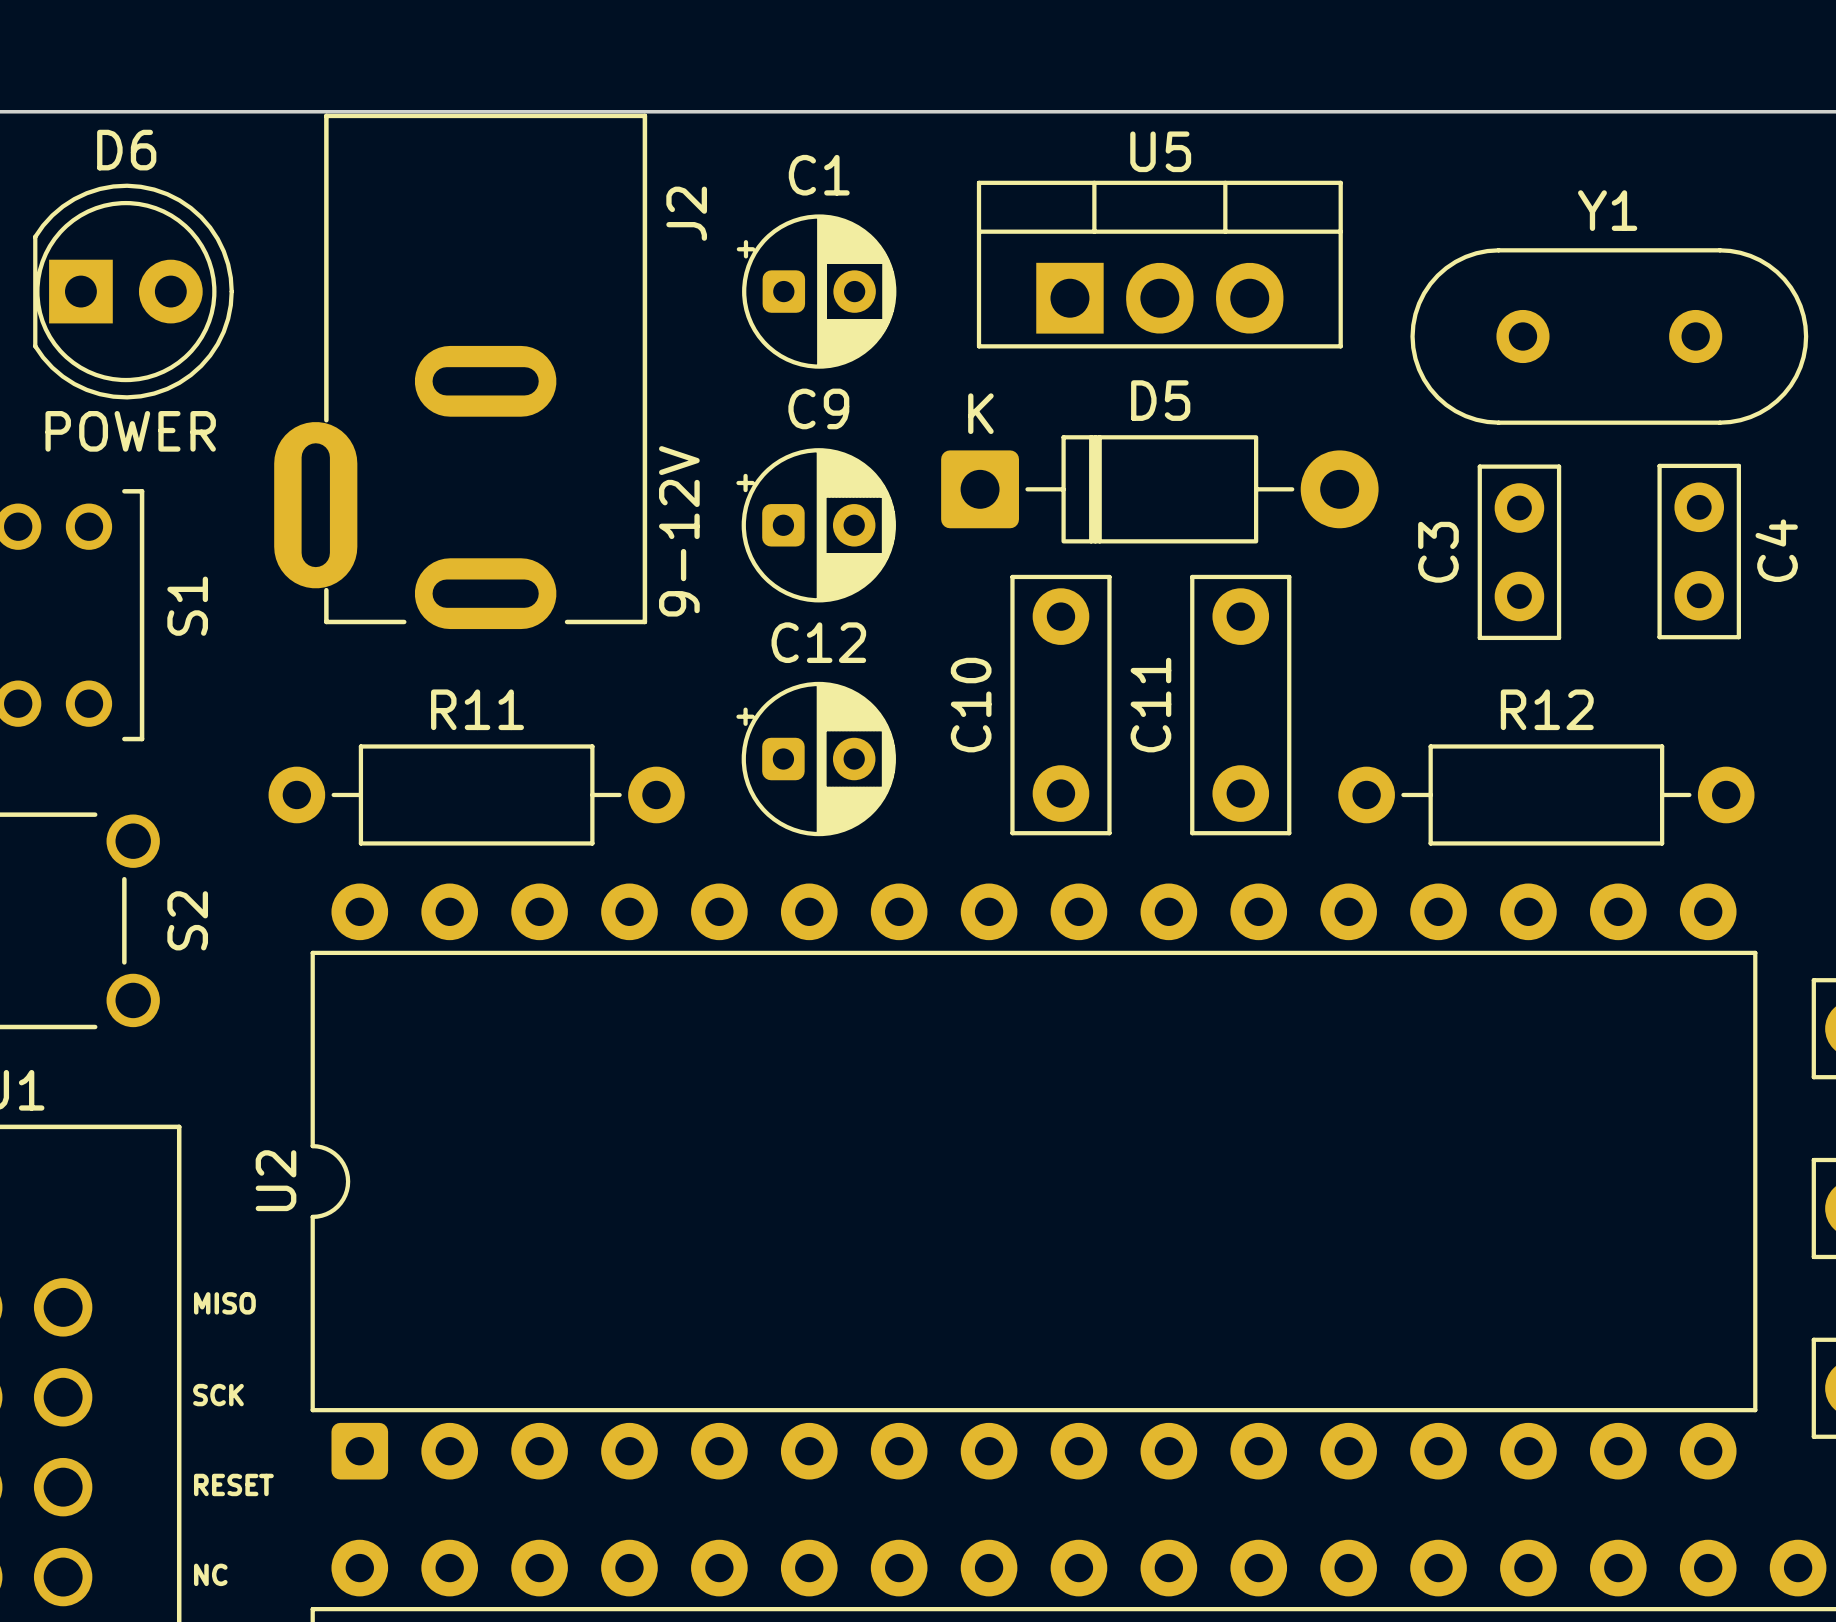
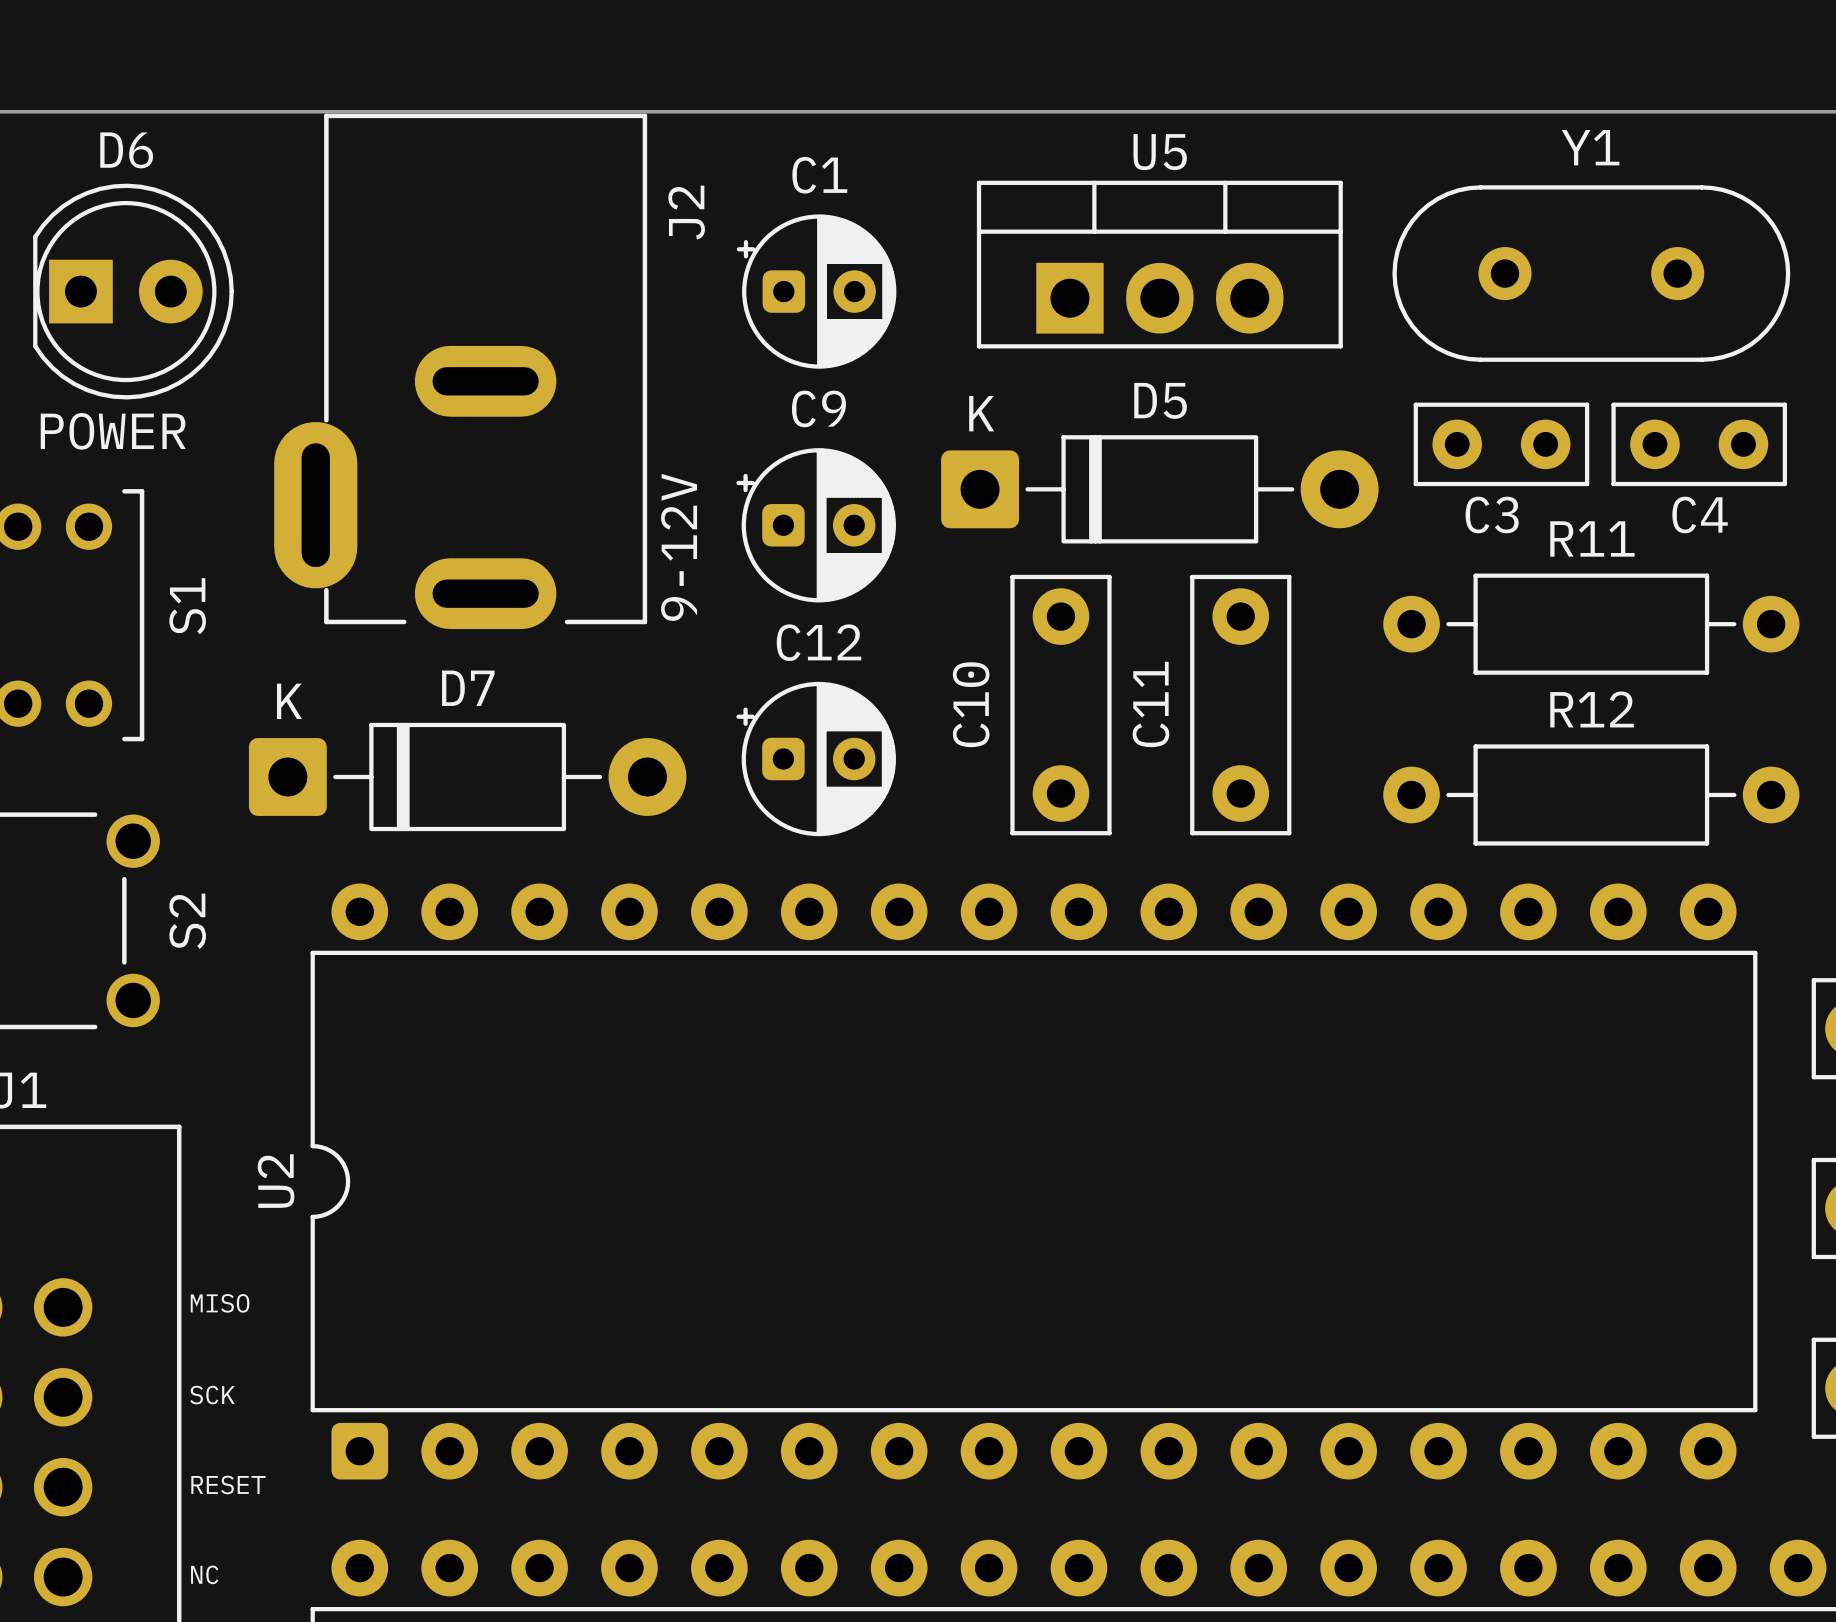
Y1 position: (1609, 336) -> (1591, 273)
C4 rotation: 0° (1699, 551) -> 90° clockwise (1699, 444)
C4 position: (1699, 551) -> (1699, 444)
C3 name position: C3 (1438, 552) -> C3 (1492, 514)
C3 rotation: 0° (1519, 552) -> 90° clockwise (1501, 444)
C3 position: (1519, 552) -> (1501, 444)
D7: none -> (467, 776)
R11 position: (476, 794) -> (1591, 624)
R12 position: (1546, 794) -> (1591, 794)

